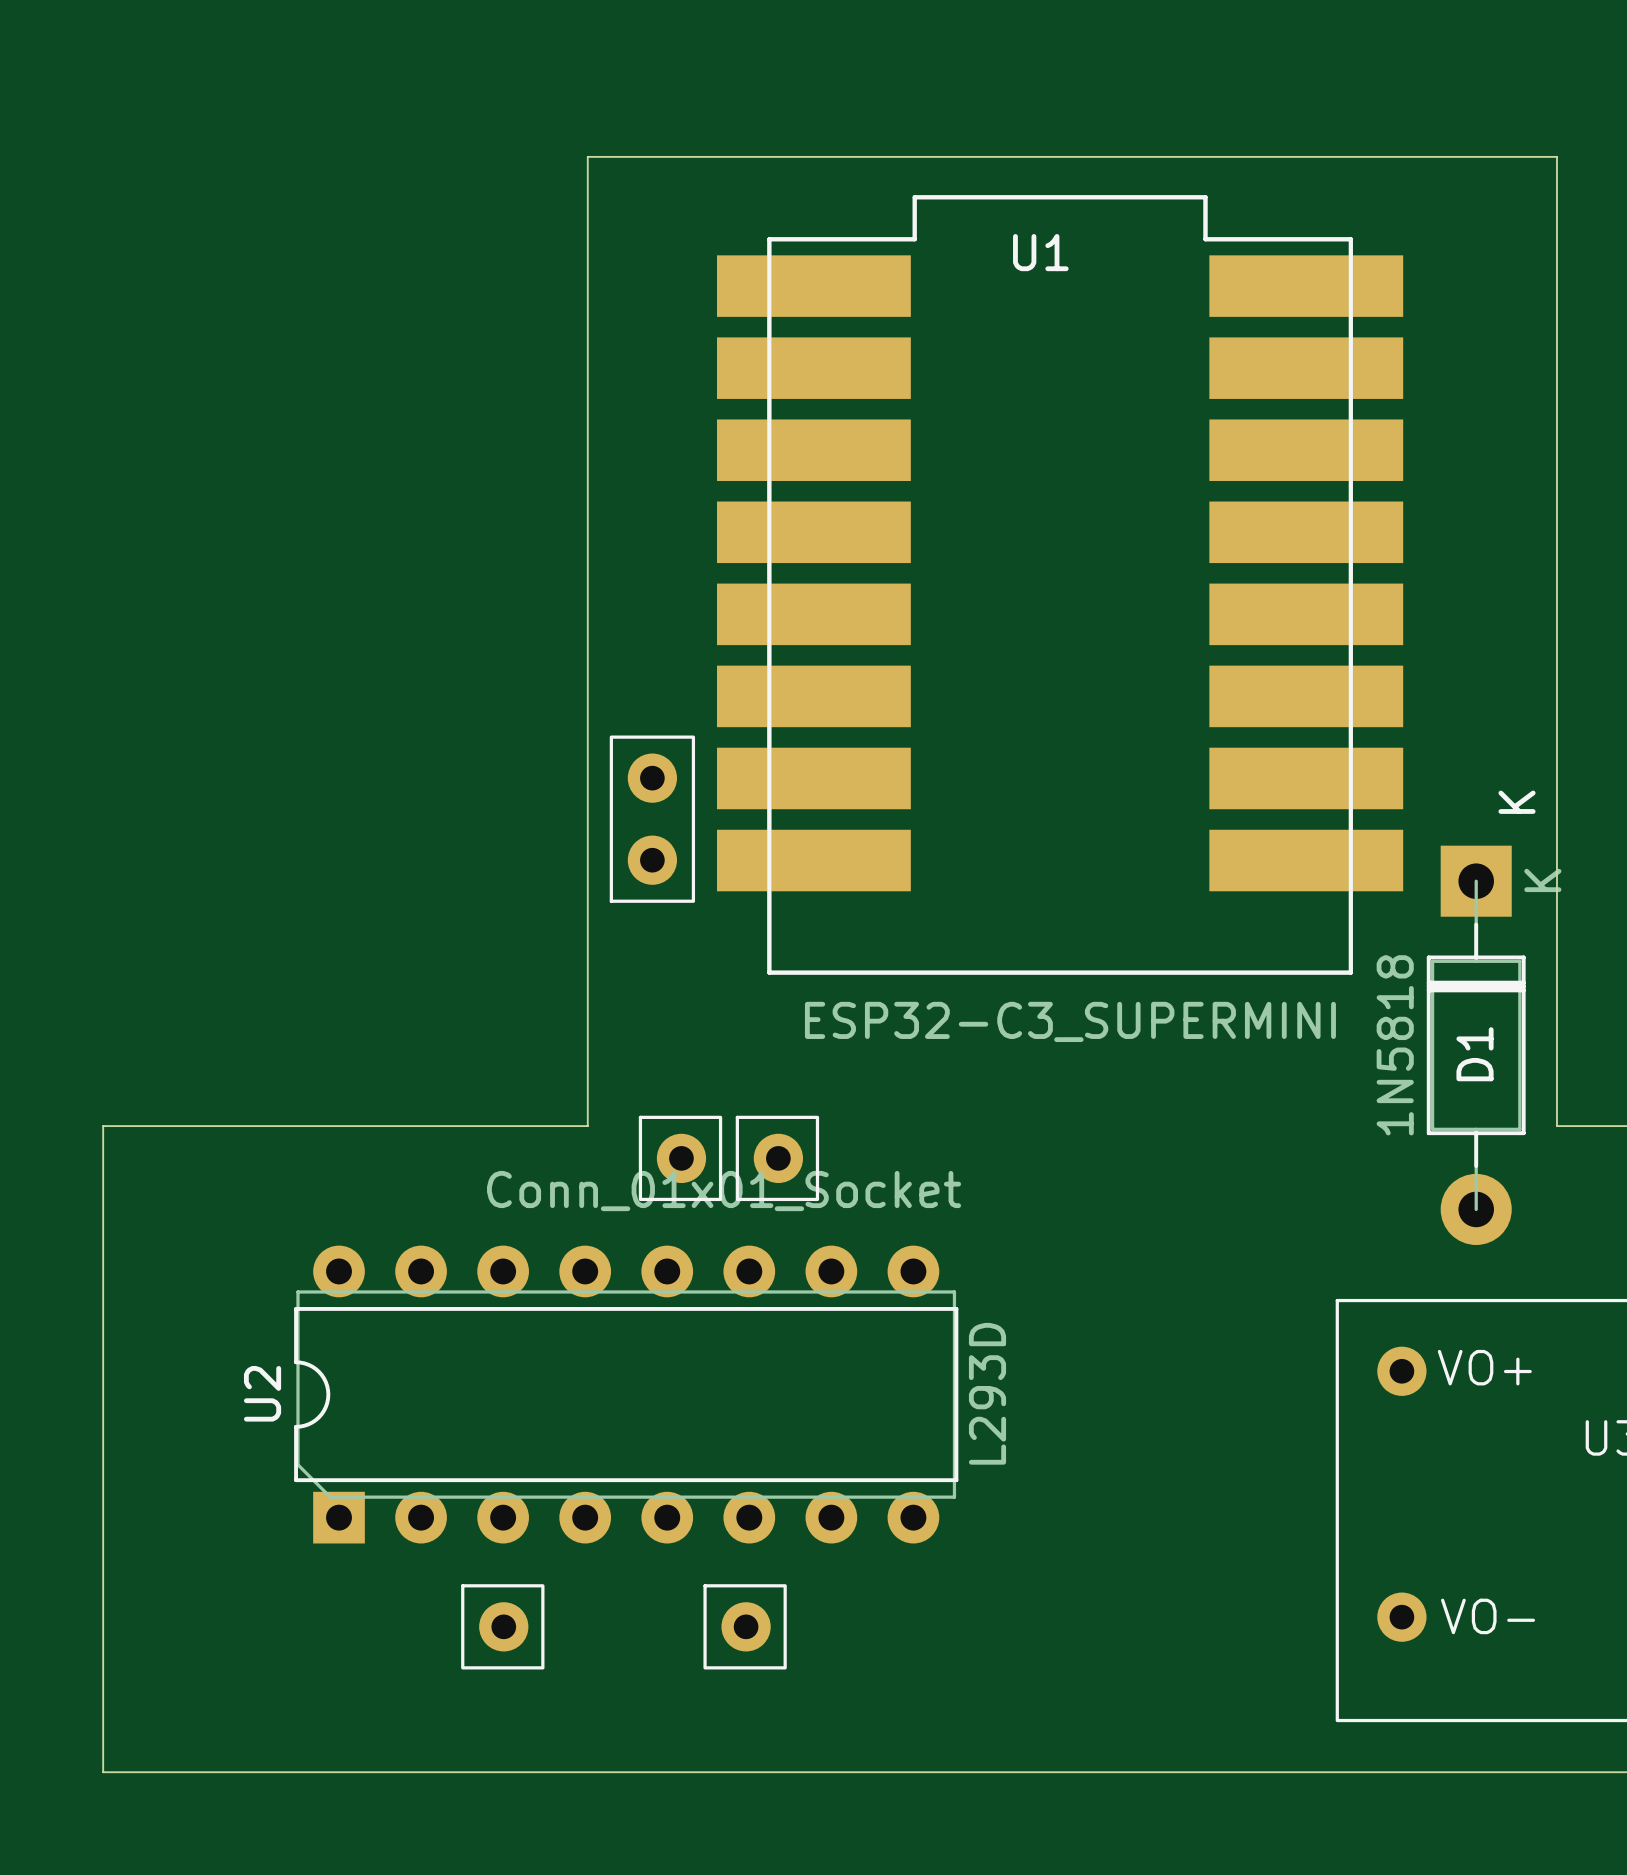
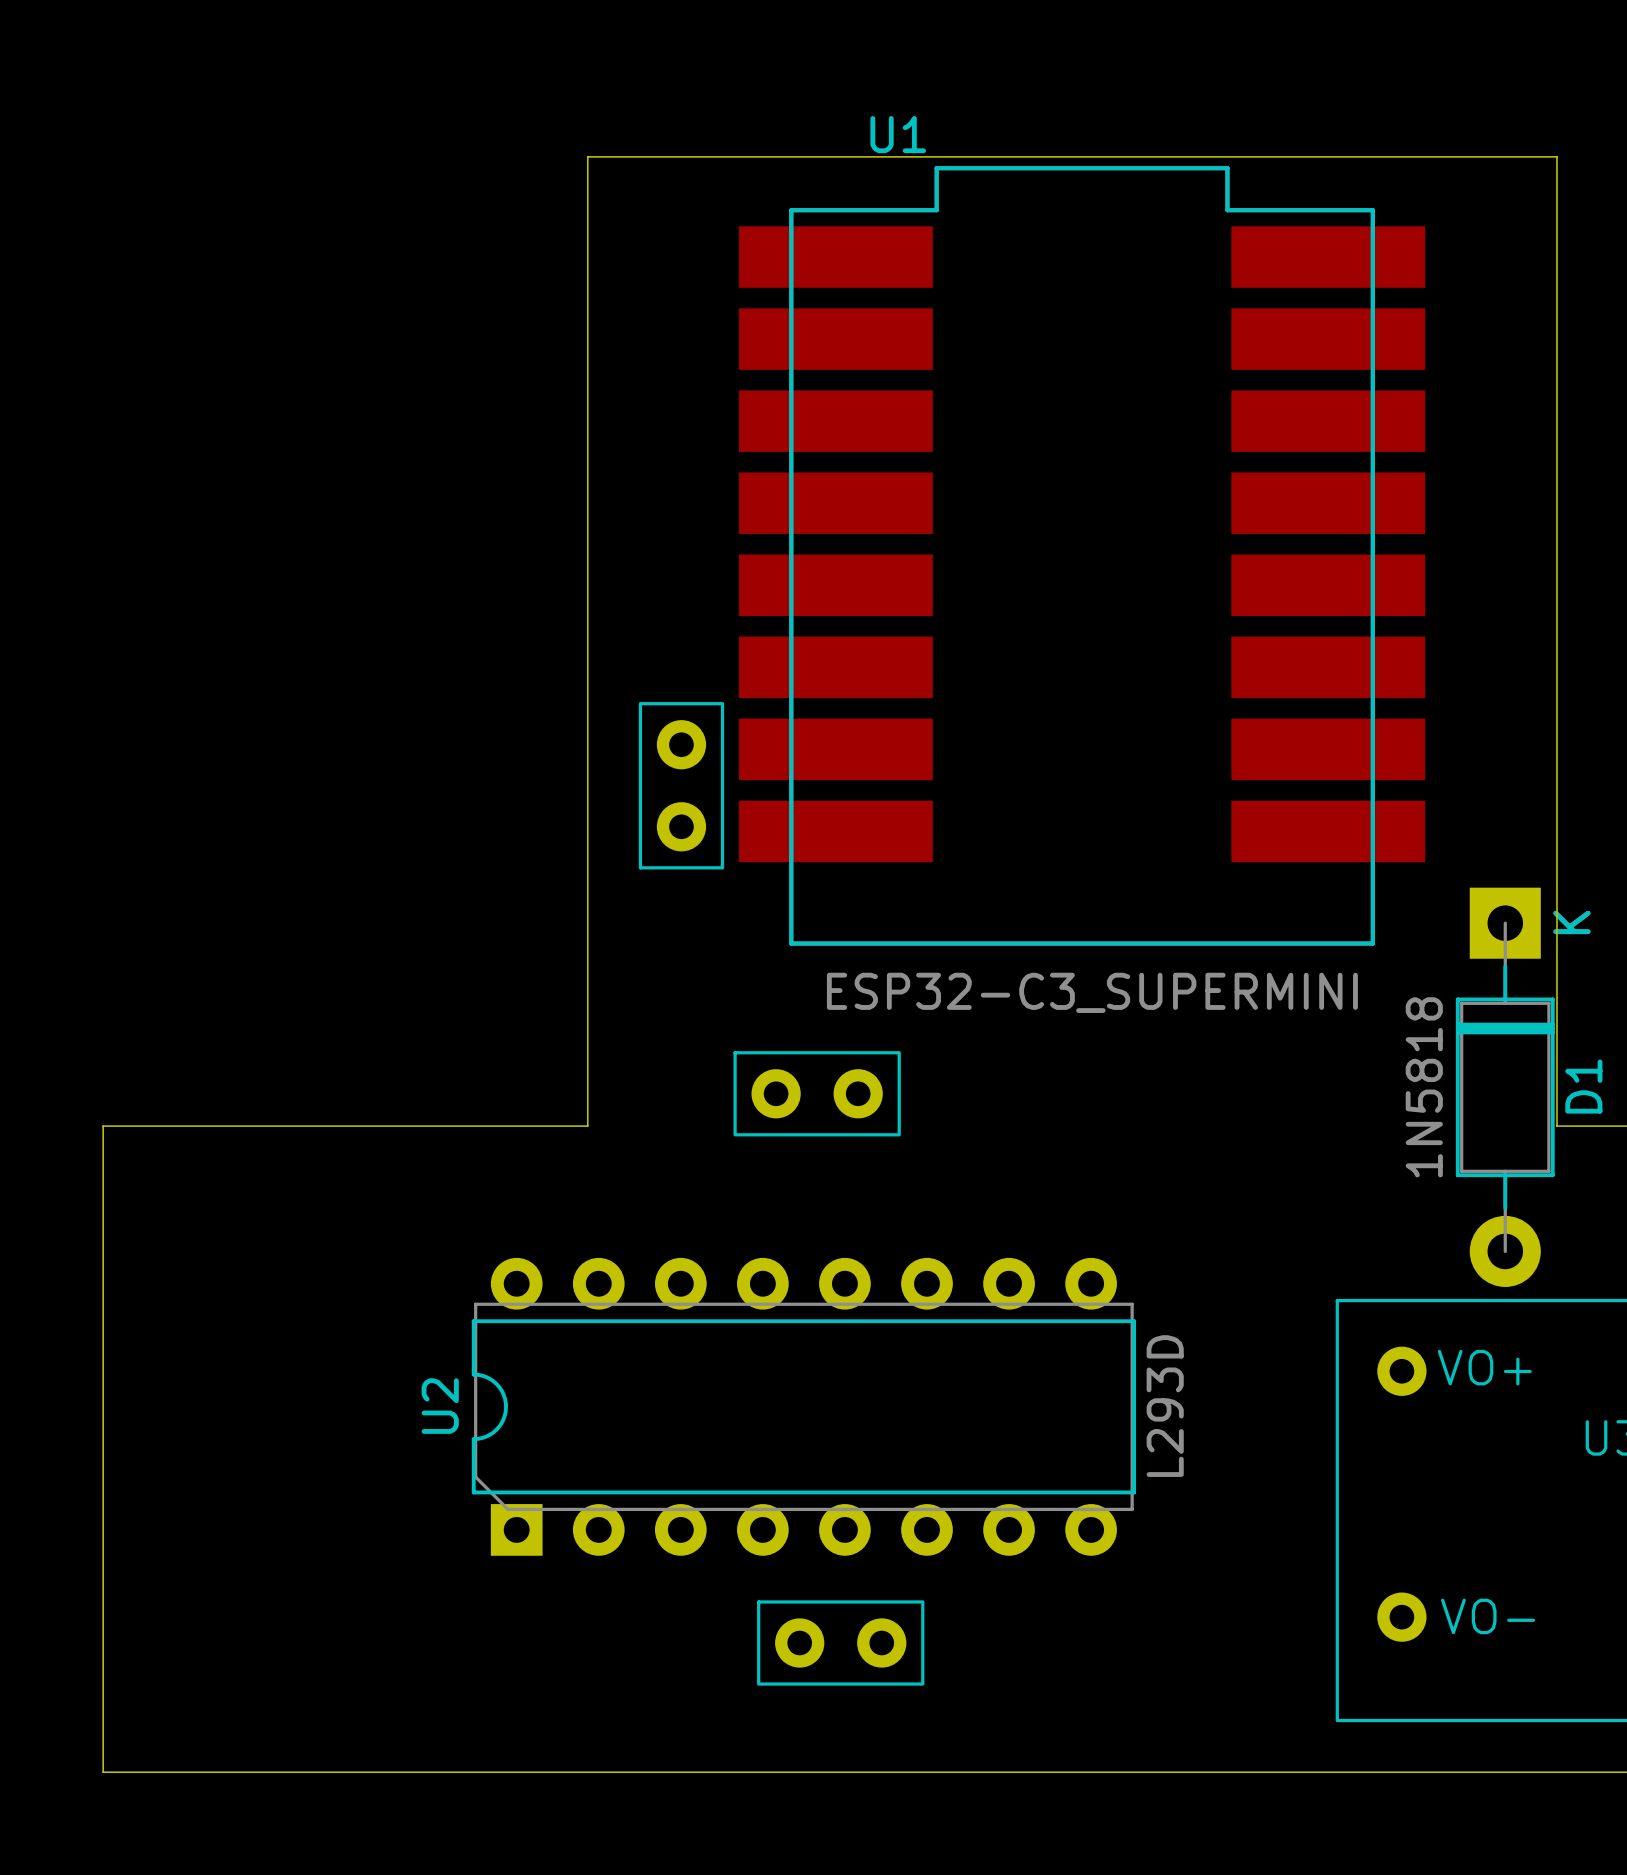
U1 name position: U1 (1040, 252) -> U1 (898, 134)
U1 position: (1060, 584) -> (1082, 555)
part position: (652, 819) -> (681, 785)
D1 footprint: [1426, 845, 1526, 1245] -> [1455, 887, 1555, 1287]
D1 name position: D1 (1475, 1054) -> D1 (1583, 1086)
part: none -> (817, 1093)
part: Conn_01x01_Socket (680, 1158) -> none
part: (777, 1158) -> none
U2 position: (626, 1394) -> (803, 1406)
part: (502, 1626) -> none
part: (745, 1626) -> none
part: none -> (840, 1642)

